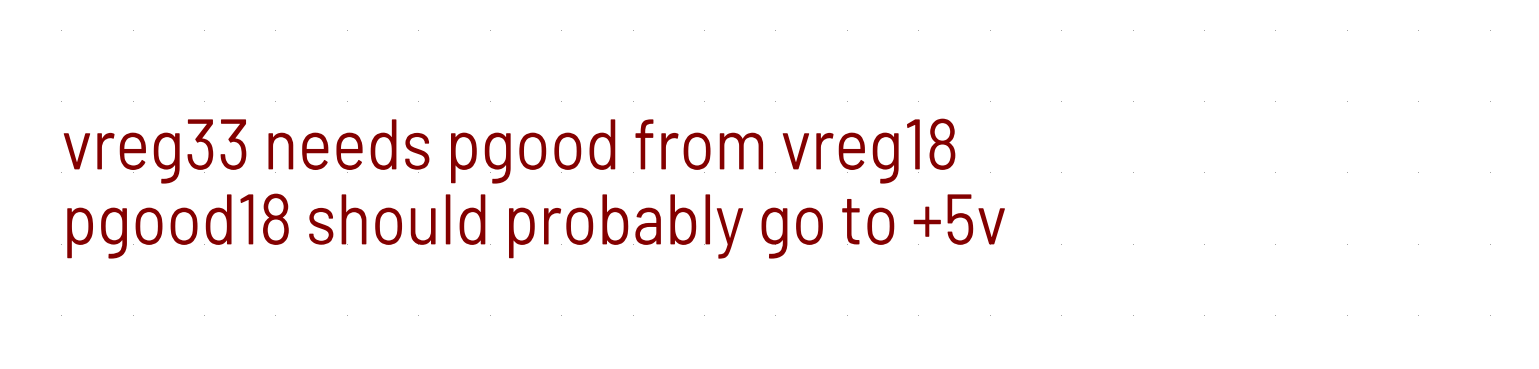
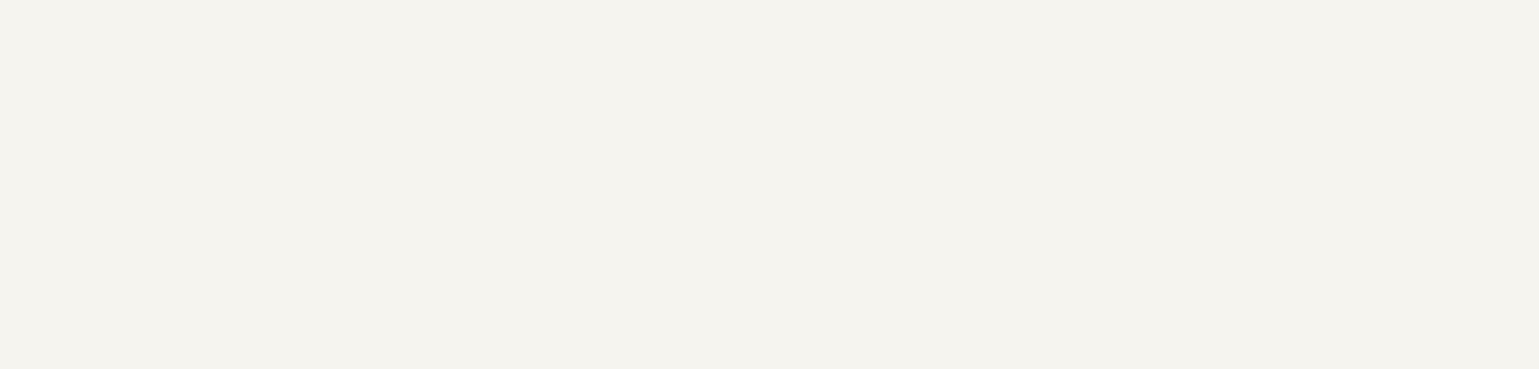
text: vreg33 needs pgood from vreg18 (509, 151) -> none
text: pgood18 should probably go to +5v (536, 226) -> none

